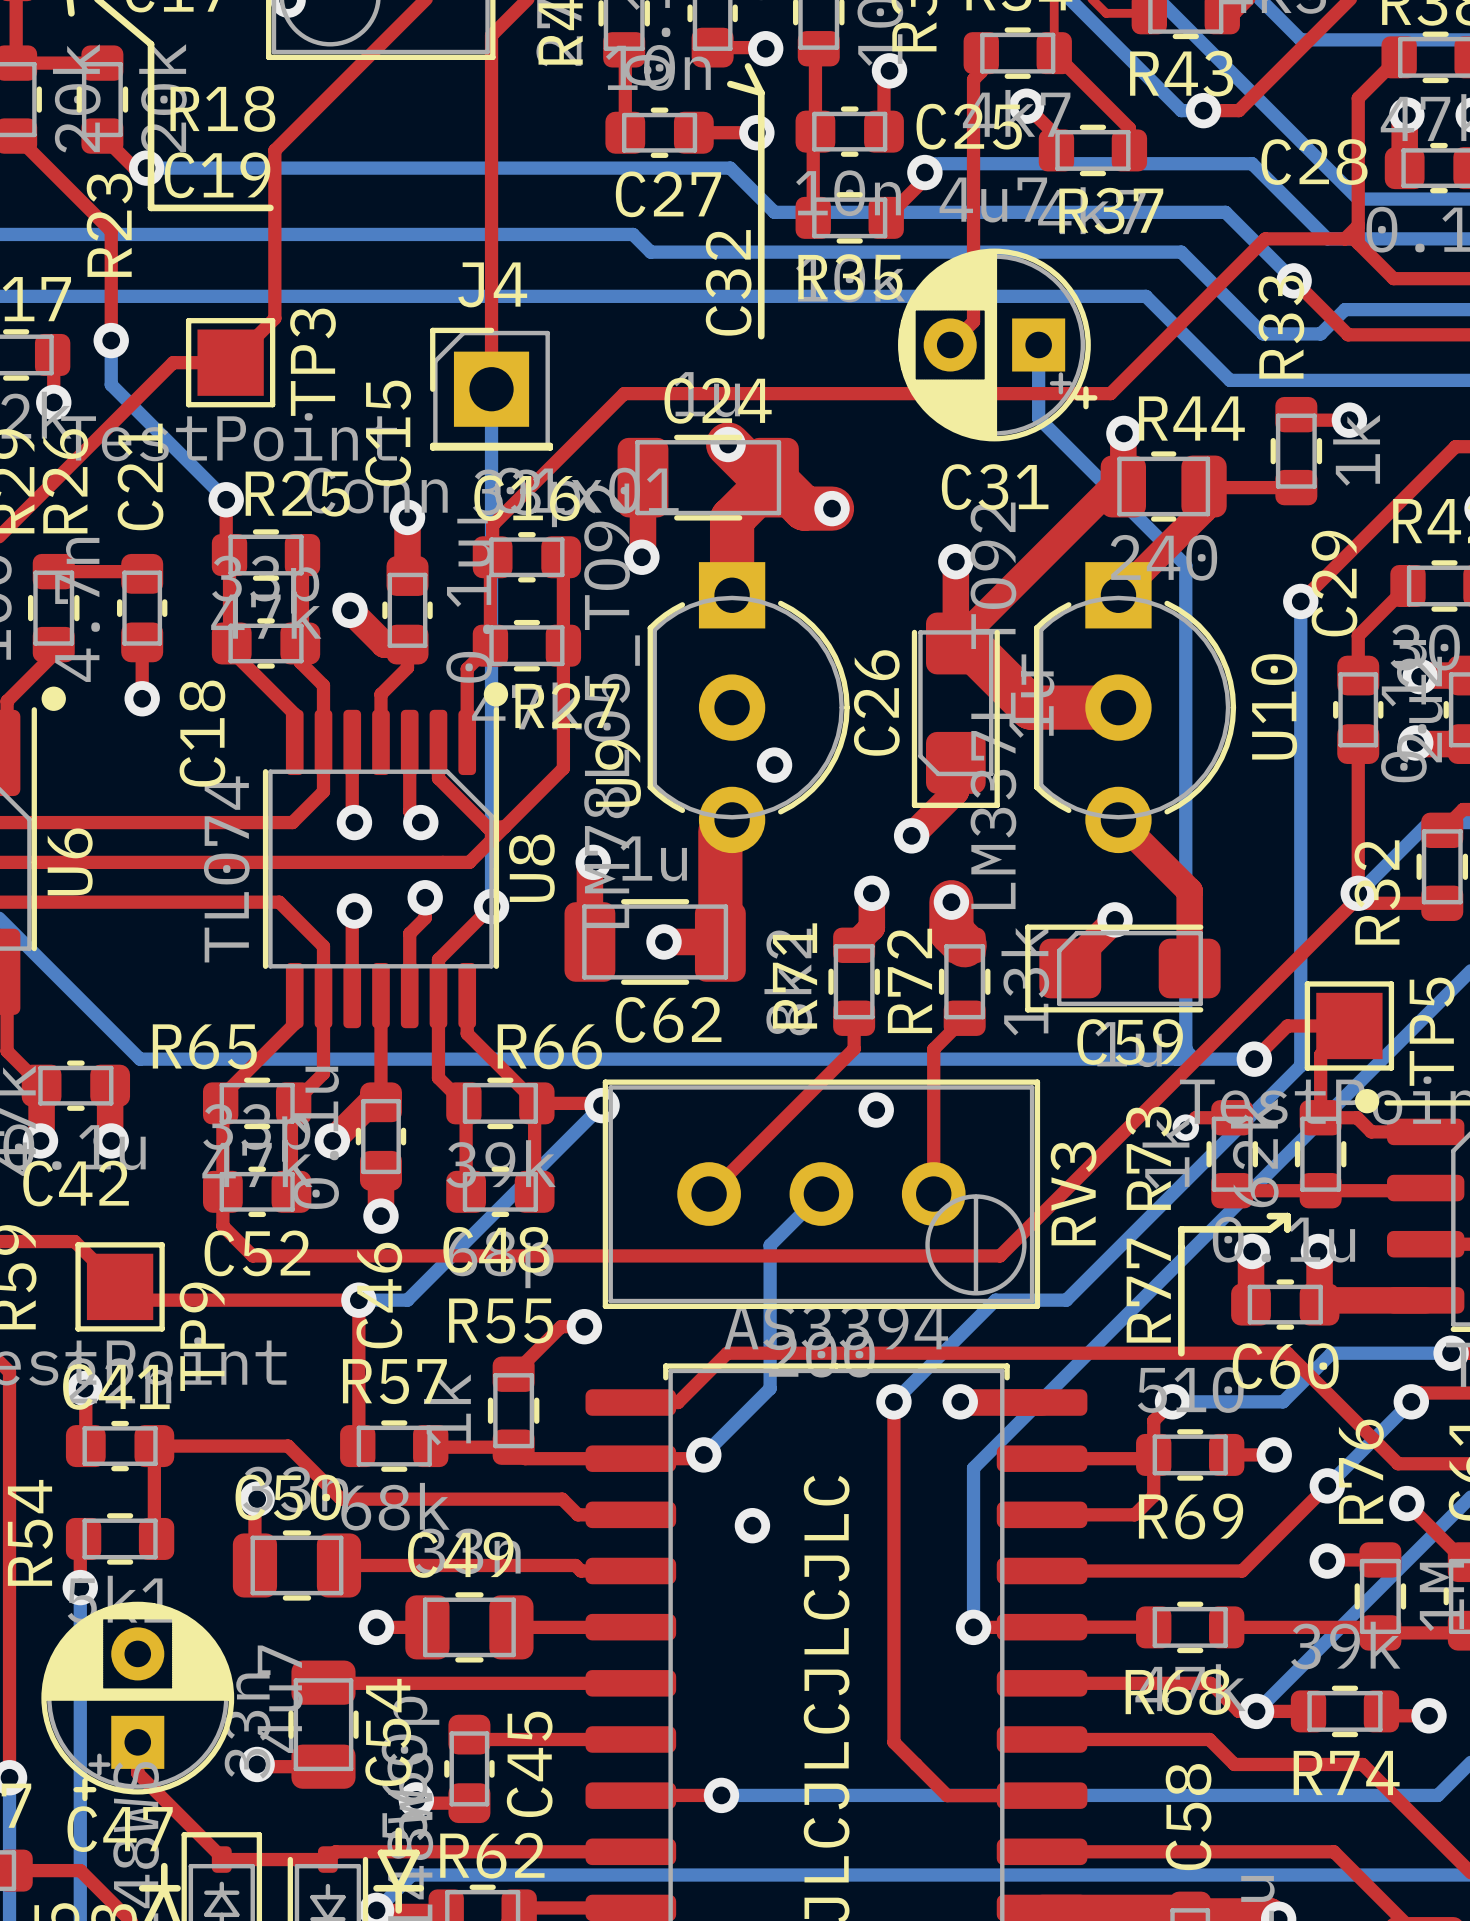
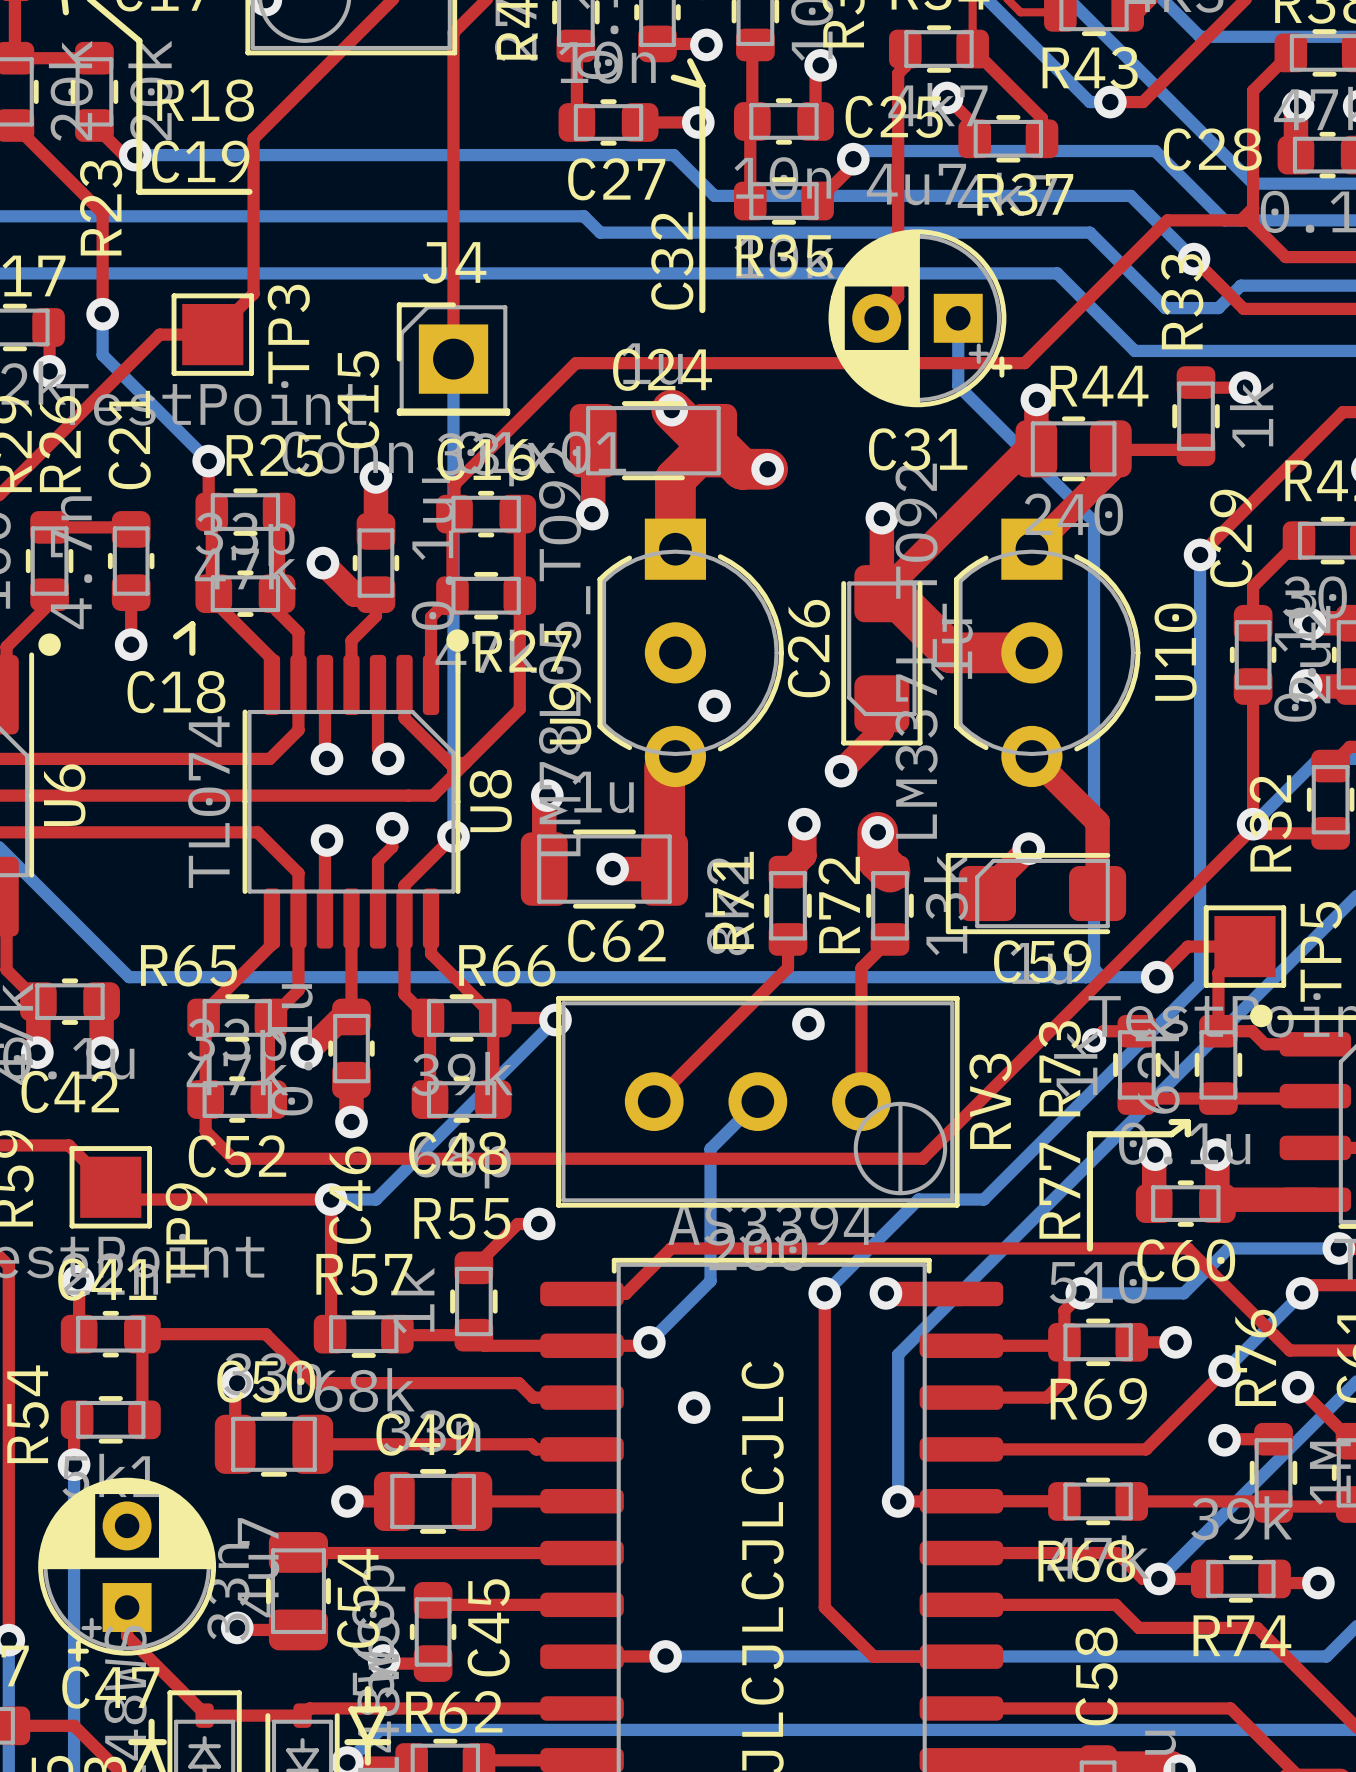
line: none -> (176, 636) (192, 624) (192, 652)
C18 name rotation: 0° (202, 733) -> 90° clockwise (176, 692)

